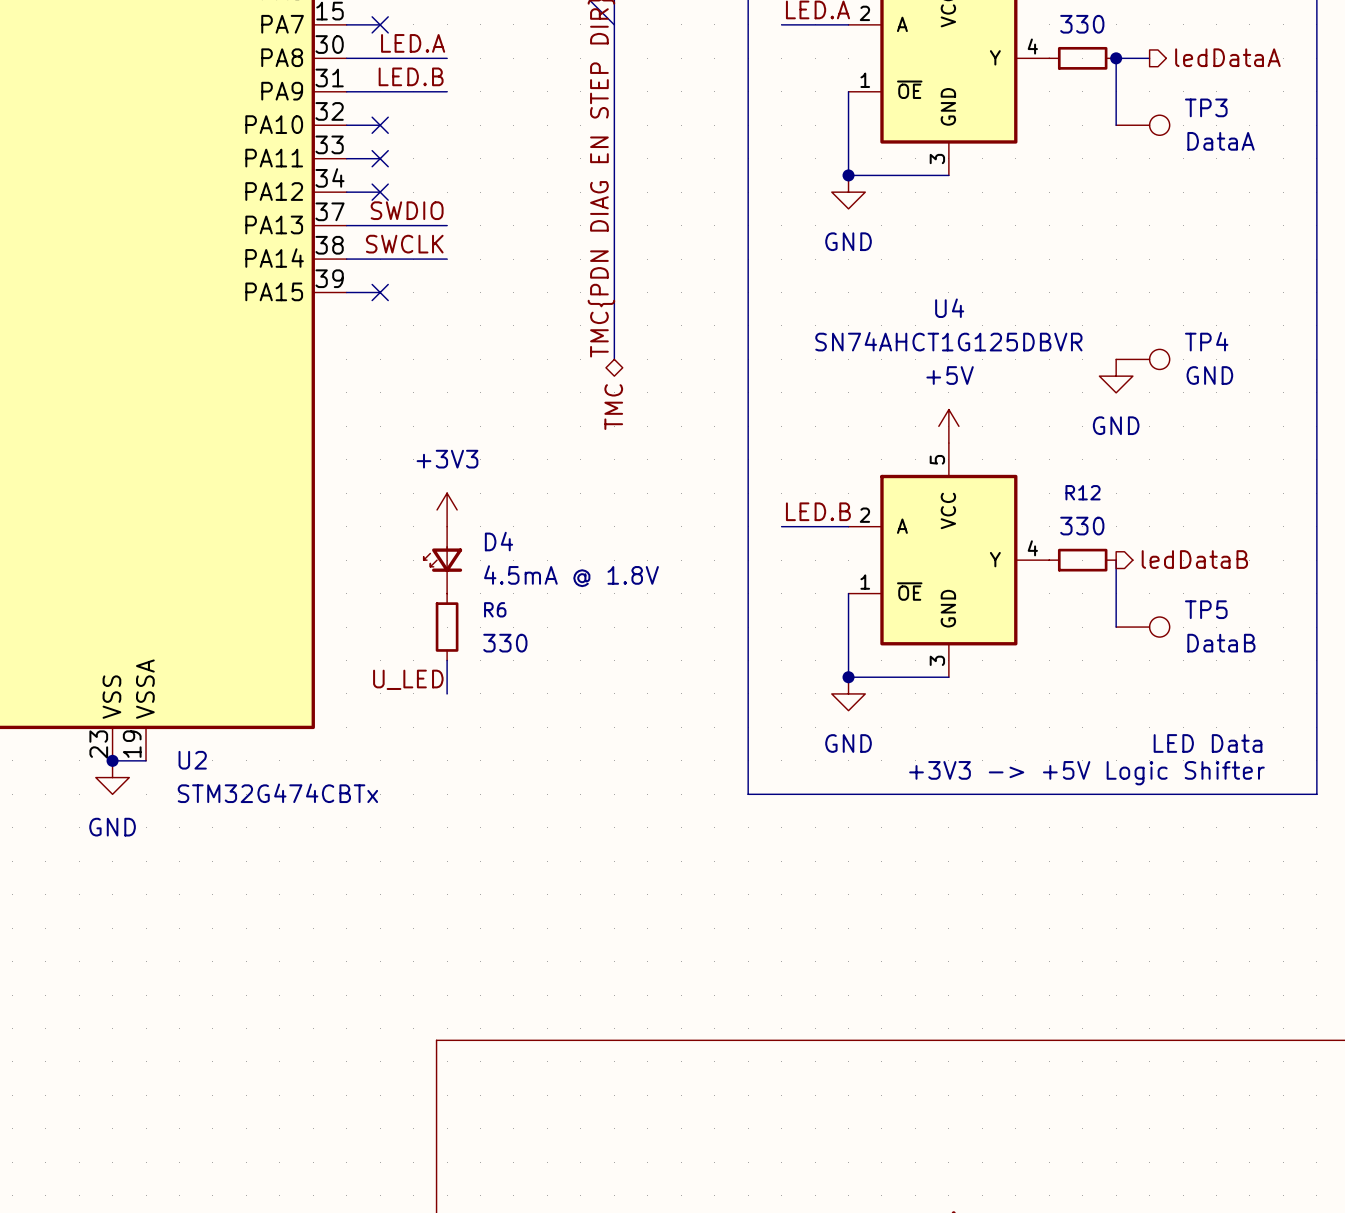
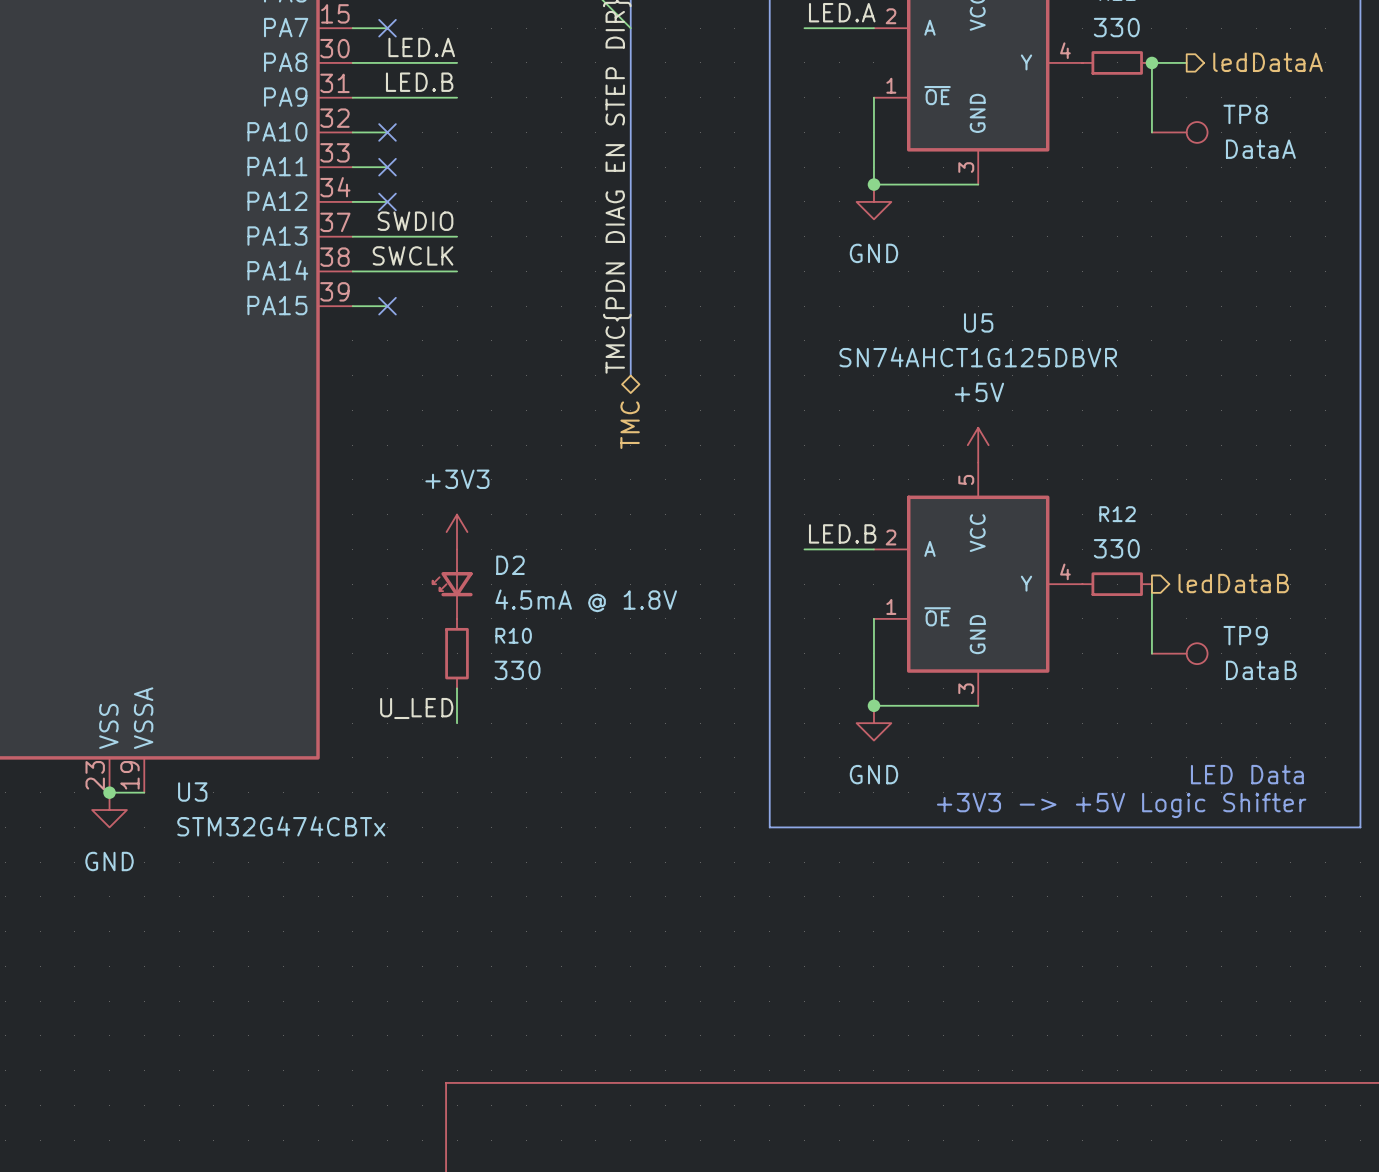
TP3 name: TP3 (1206, 107) -> TP8 (1245, 114)
U4 name: U4 (949, 308) -> U5 (978, 322)
TP4: GND (1142, 359) -> none
power symbol: GND (1116, 376) -> none
D4 name: D4 (498, 541) -> D2 (510, 565)
R6 name: R6 (495, 609) -> R10 (513, 635)
TP5 name: TP5 (1206, 609) -> TP9 (1245, 635)
U2 name: U2 (192, 760) -> U3 (192, 792)

